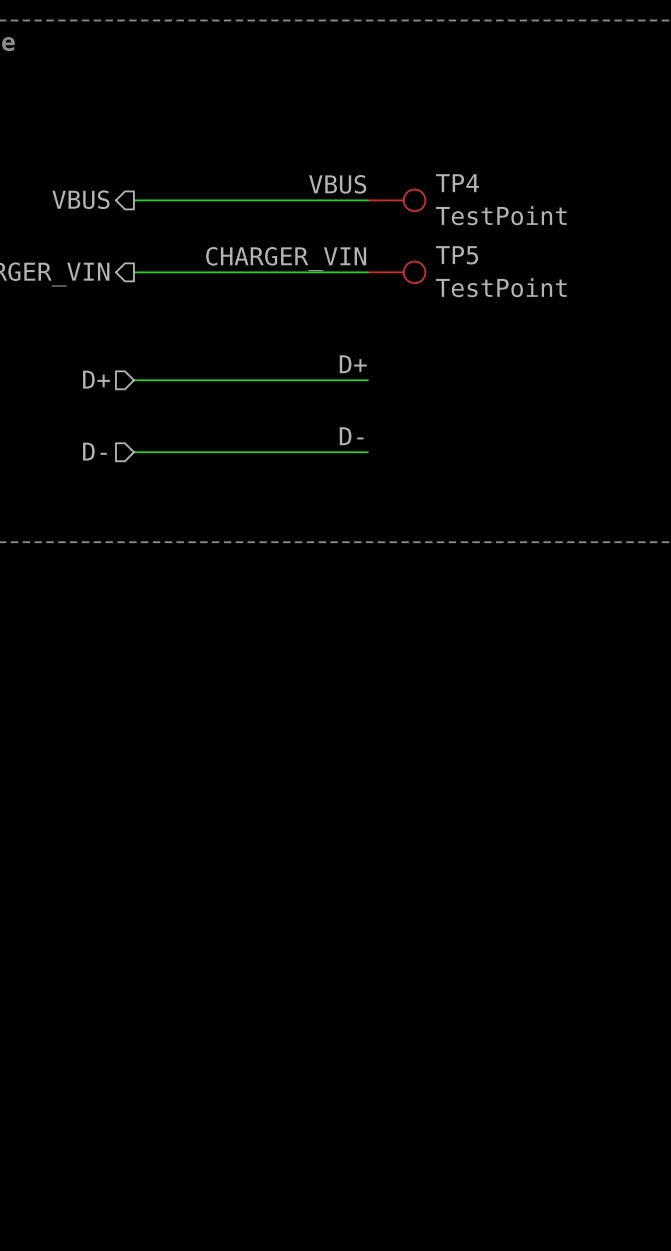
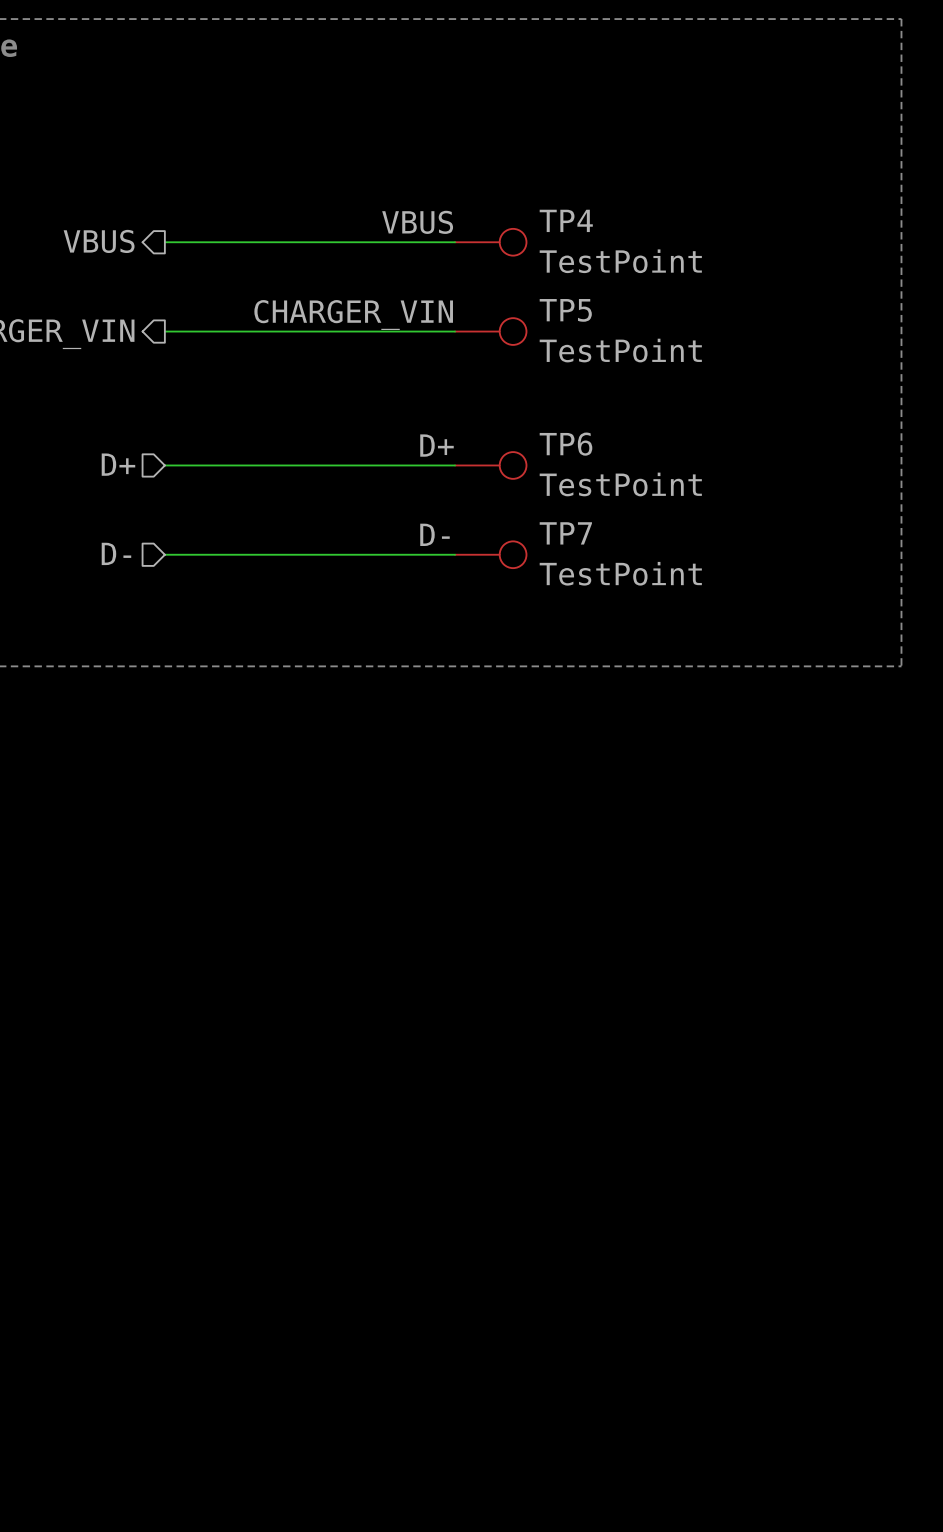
TP6: none -> TestPoint (490, 465)
TP7: none -> TestPoint (490, 554)

